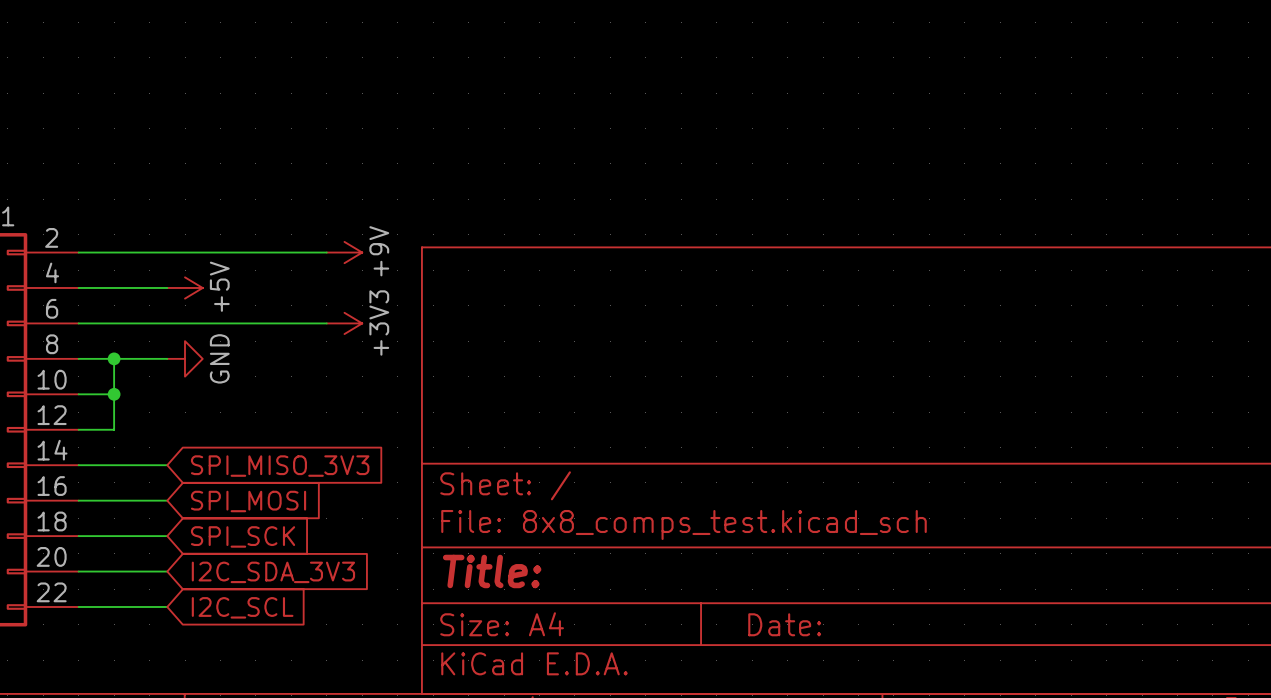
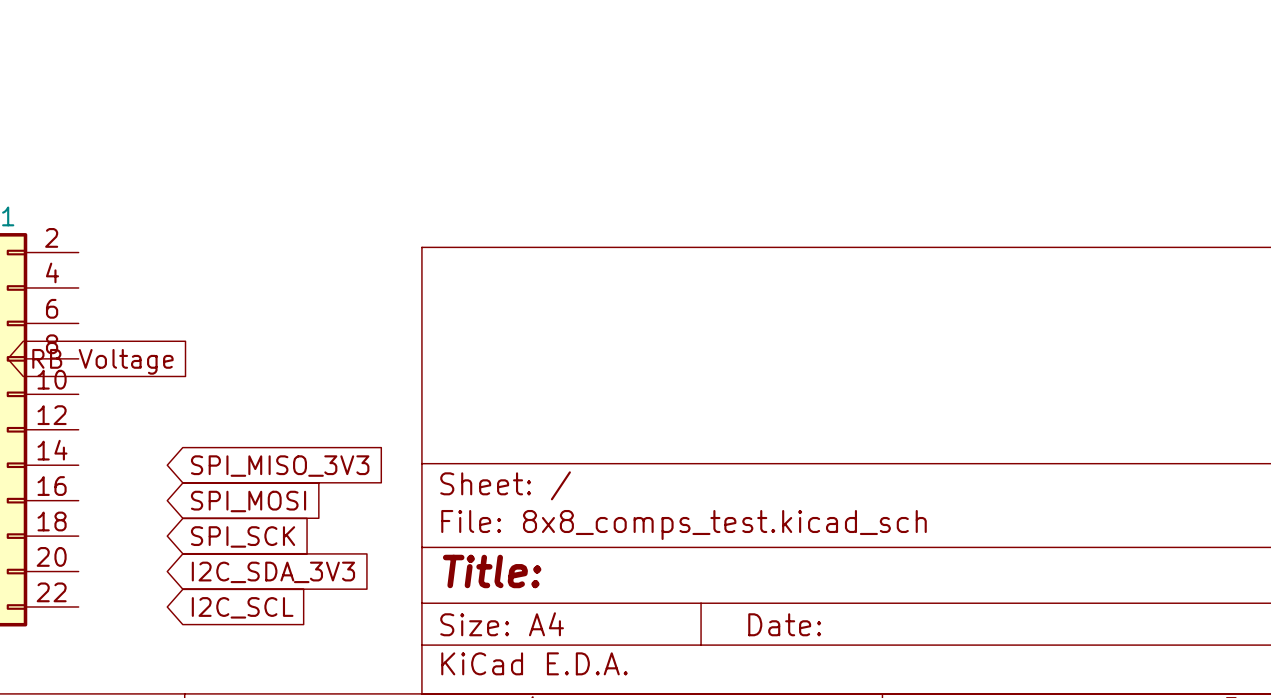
wire: (78, 252) (326, 252) -> none
power symbol: +9V (344, 252) -> none
wire: (78, 287) (167, 287) -> none
power symbol: +5V (185, 287) -> none
wire: (78, 323) (326, 323) -> none
power symbol: +3V3 (344, 323) -> none
wire: (78, 358) (167, 358) -> none
wire: (114, 358) (114, 429) (78, 429) -> none
junction: (114, 358) -> none
power symbol: GND (185, 358) -> none
global label: none -> RB Voltage (102, 361)
wire: (78, 394) (114, 394) -> none
junction: (114, 394) -> none
wire: (78, 465) (167, 465) -> none
wire: (78, 500) (167, 500) -> none
wire: (78, 536) (167, 536) -> none
wire: (78, 571) (167, 571) -> none
wire: (78, 606) (167, 606) -> none

